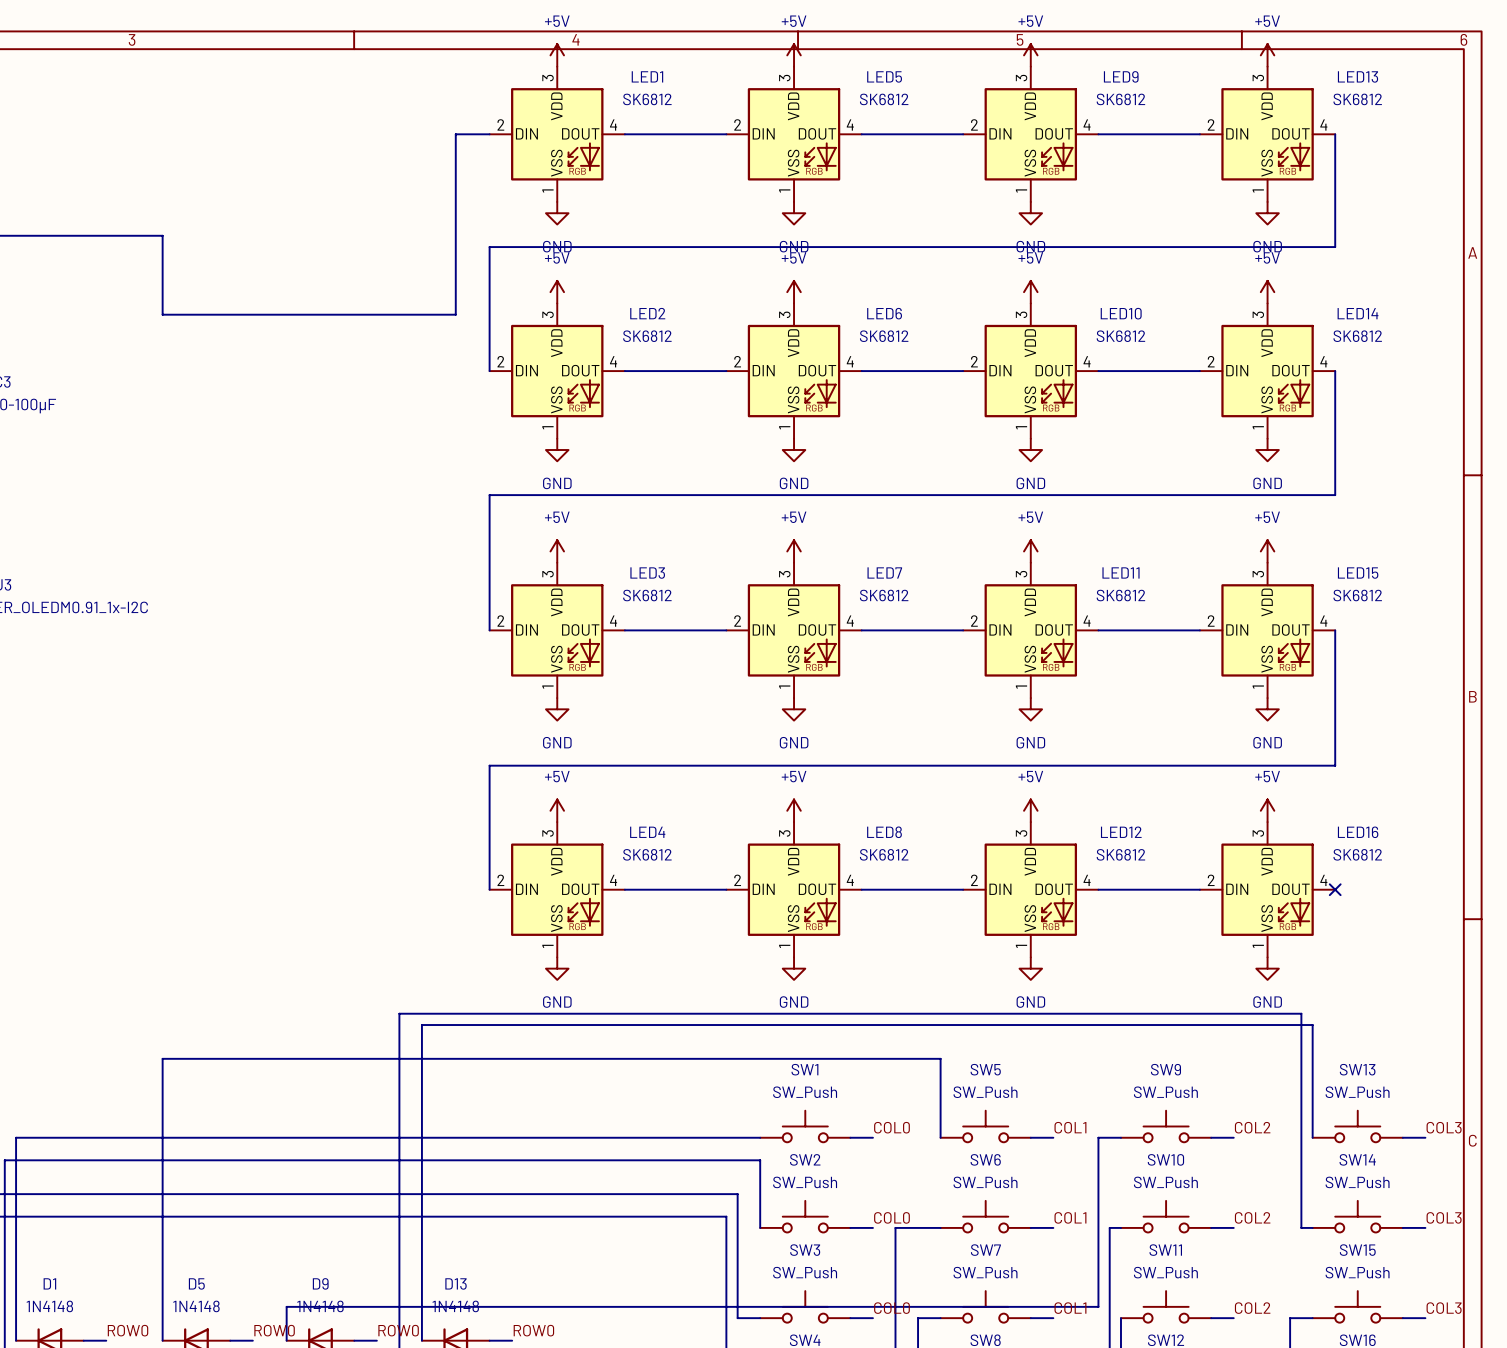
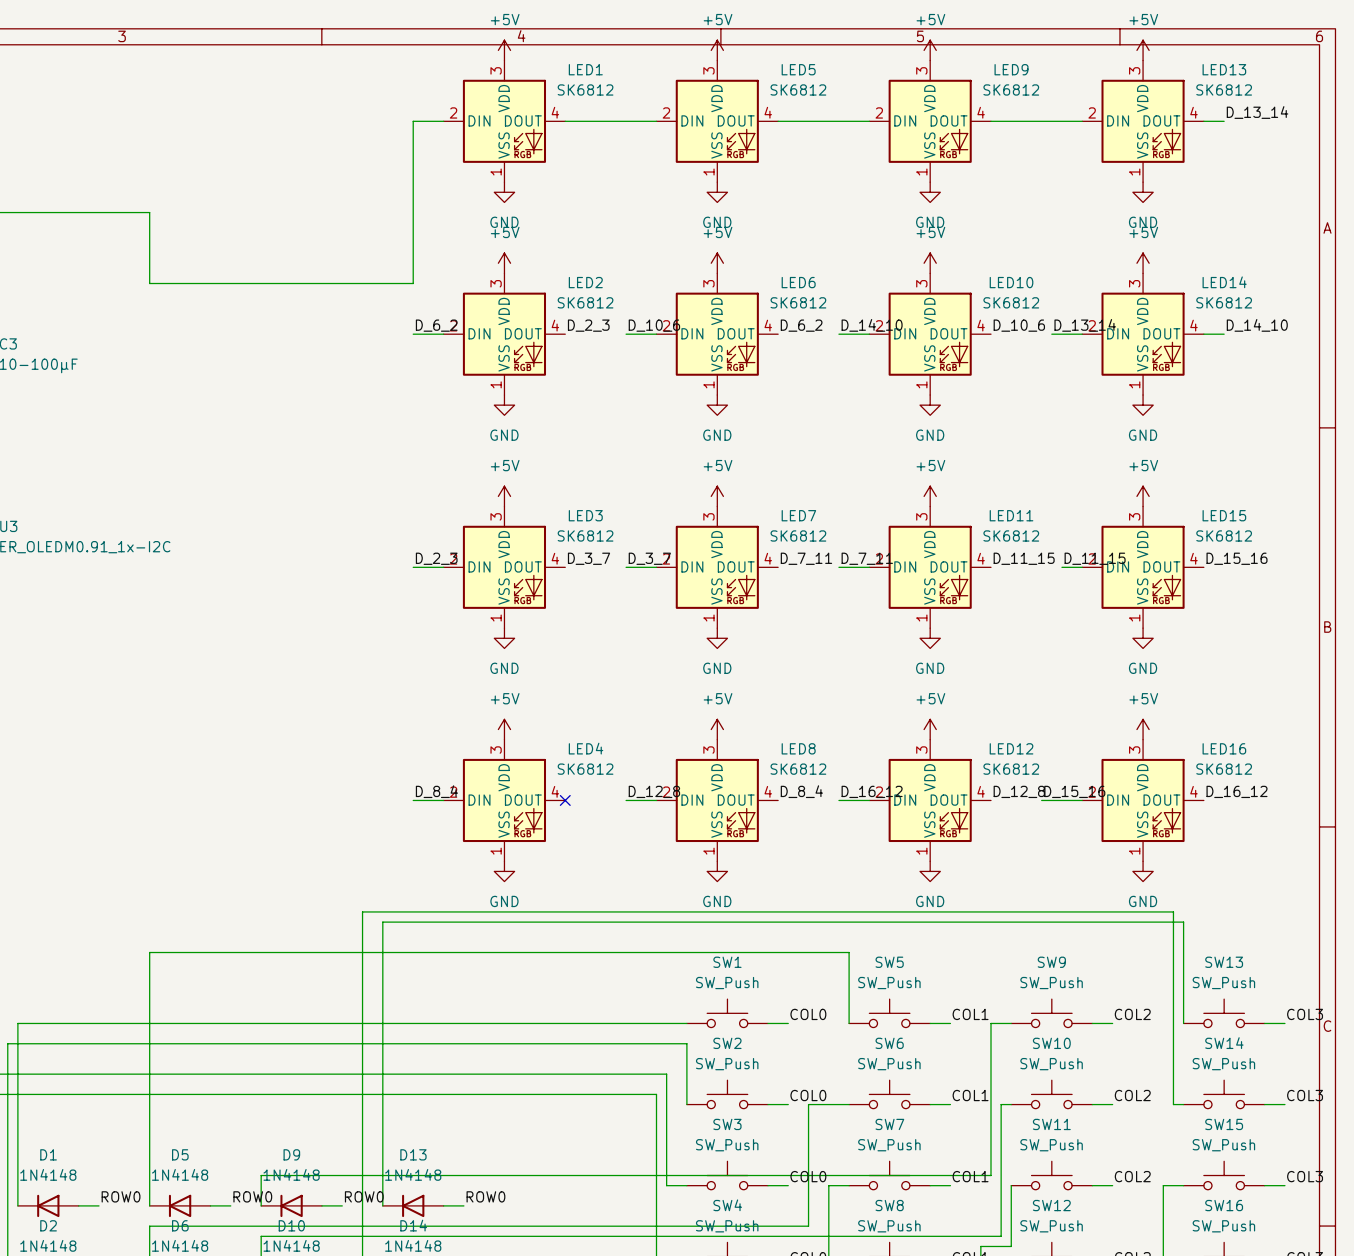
label: none -> D_13_14 (1257, 112)
wire: (1335, 134) (1335, 247) (489, 247) (489, 371) -> (1203, 121) (1224, 121)
label: none -> D_6_2 (436, 325)
label: none -> D_2_3 (588, 325)
label: none -> D_10_6 (654, 325)
label: none -> D_6_2 (801, 325)
label: none -> D_14_10 (872, 325)
label: none -> D_10_6 (1019, 325)
label: none -> D_13_14 (1085, 325)
label: none -> D_14_10 (1257, 325)
wire: none -> (413, 334) (443, 334)
wire: (624, 371) (692, 371) -> none
wire: (861, 371) (929, 371) -> none
wire: (1098, 371) (1166, 371) -> none
wire: (1335, 371) (1335, 495) (489, 495) (489, 630) -> (1203, 334) (1224, 334)
label: none -> D_2_3 (436, 558)
label: none -> D_3_7 (589, 558)
label: none -> D_3_7 (649, 558)
label: none -> D_7_11 (806, 558)
label: none -> D_7_11 (867, 558)
label: none -> D_11_15 (1024, 558)
label: none -> D_11_15 (1095, 558)
label: none -> D_15_16 (1237, 558)
wire: none -> (413, 567) (443, 567)
wire: (624, 630) (692, 630) -> none
wire: (861, 630) (929, 630) -> none
wire: (1098, 630) (1177, 630) -> none
wire: (1335, 630) (1335, 765) (489, 765) (489, 889) -> (413, 800) (443, 800)
label: none -> D_8_4 (436, 791)
label: none -> D_12_8 (654, 791)
label: none -> D_8_4 (801, 791)
label: none -> D_16_12 (872, 791)
label: none -> D_12_8 (1019, 791)
label: none -> D_15_16 (1074, 791)
label: none -> D_16_12 (1237, 791)
wire: (624, 889) (692, 889) -> none
no-connect mark: none -> (565, 800)
wire: (861, 889) (929, 889) -> none
wire: (1098, 889) (1154, 889) -> none
no-connect mark: (1335, 889) -> none

